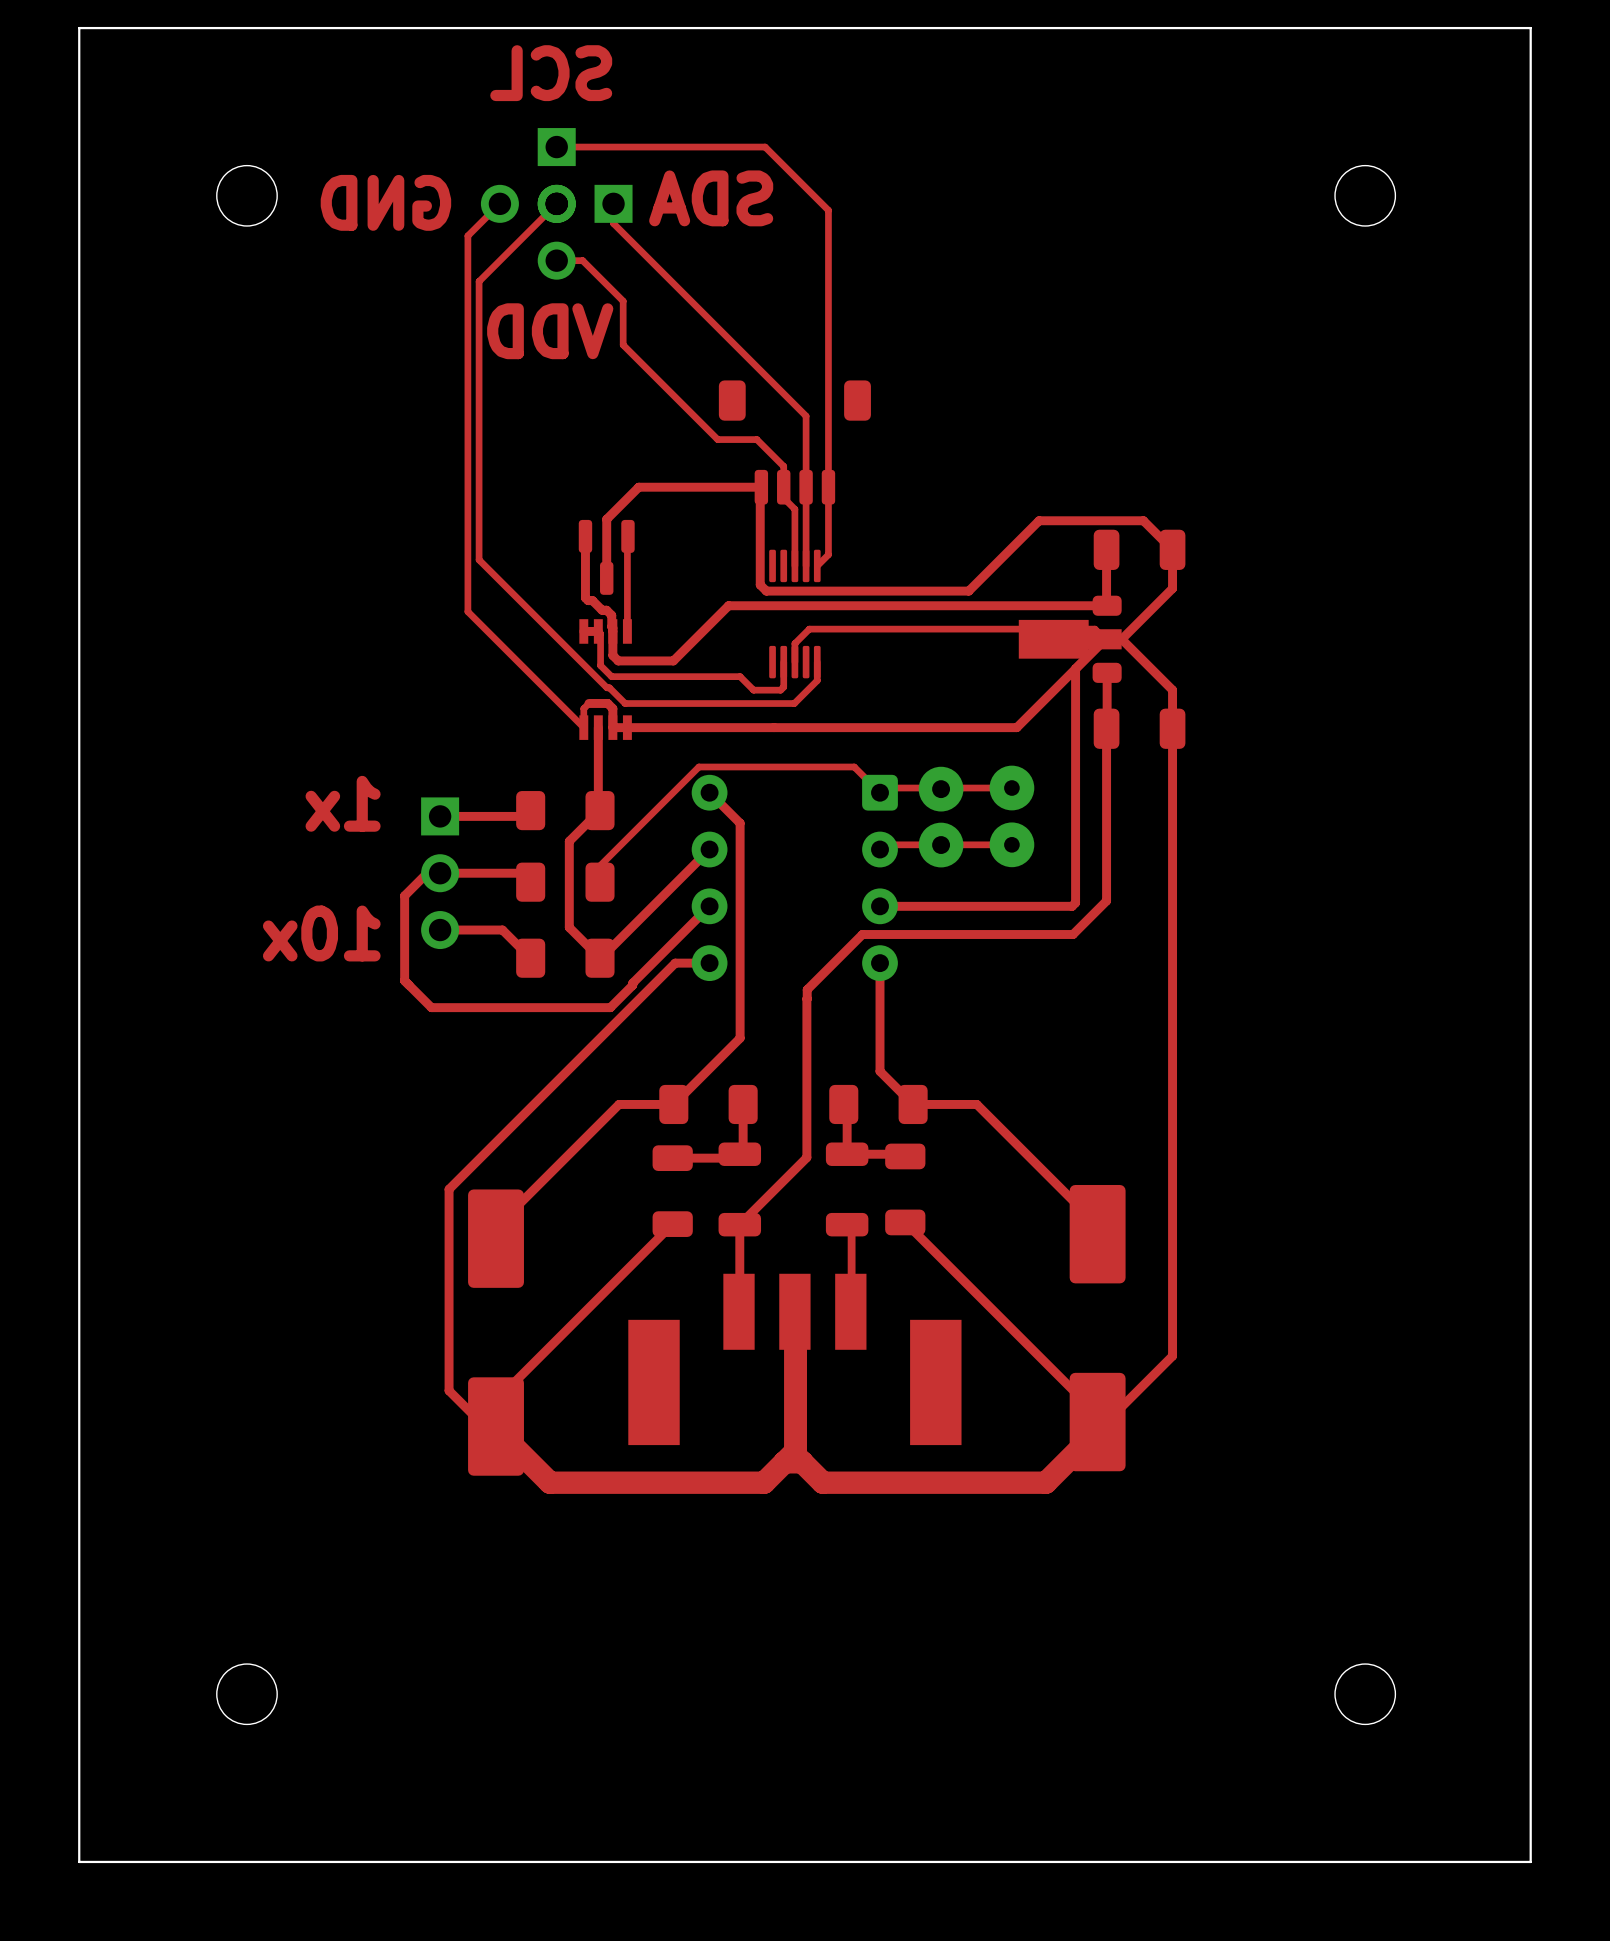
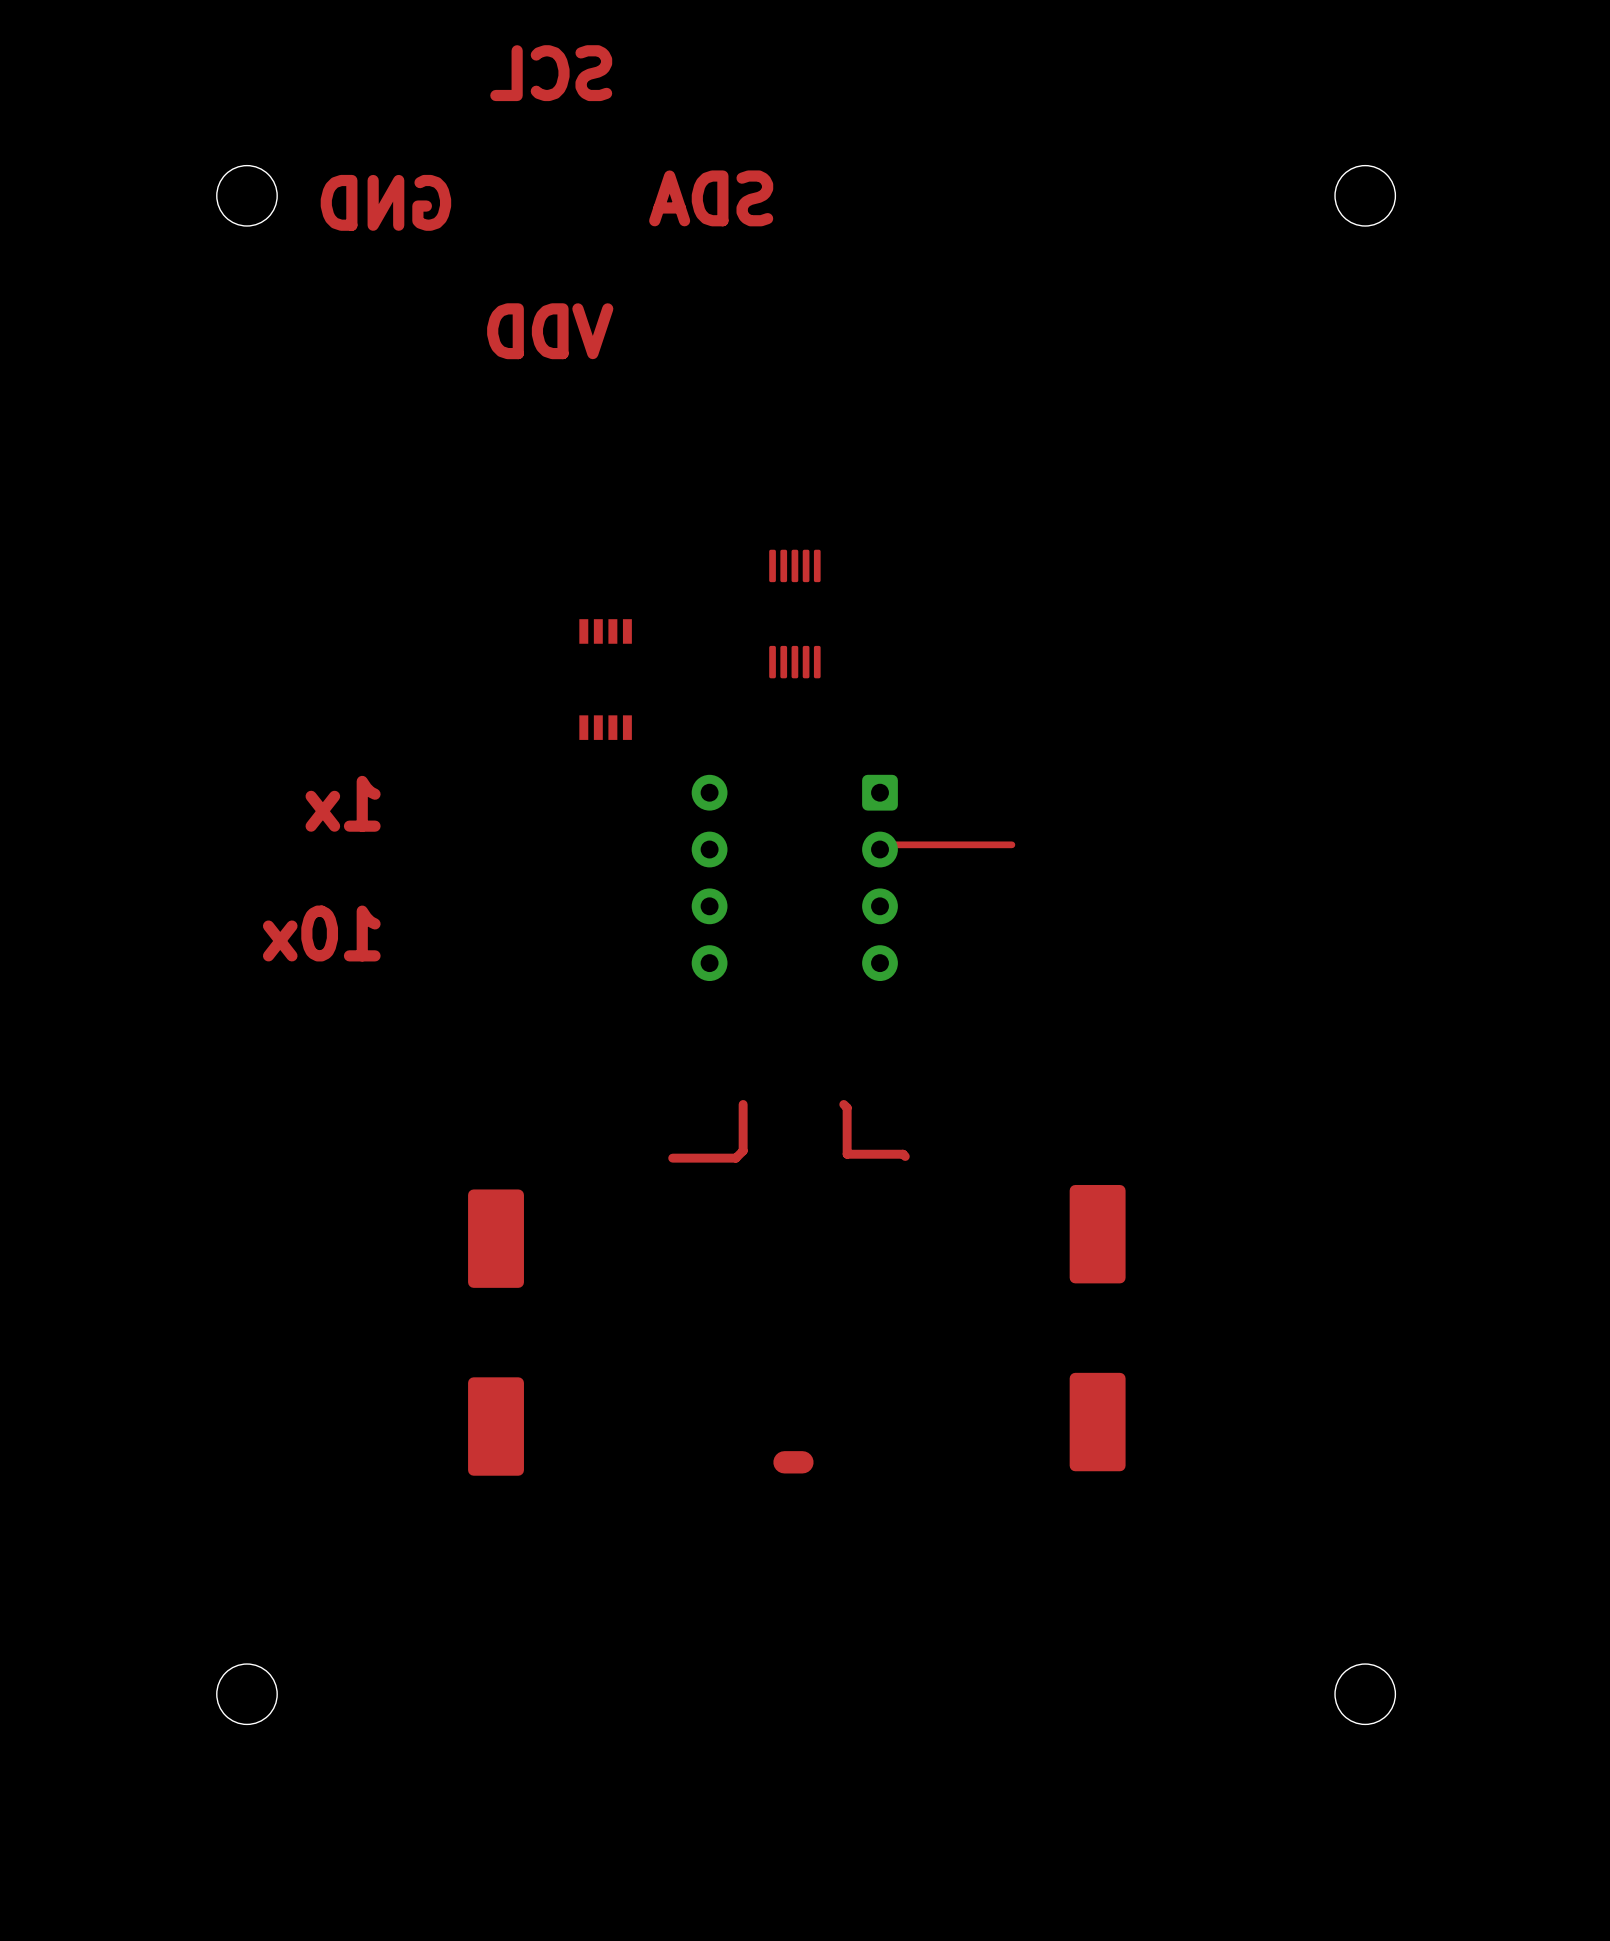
board edge: (1530, 28) (79, 28) (79, 1861) (1530, 1861) (1530, 28) -> none
top track: (556, 147) (765, 147) (828, 210) (828, 554) (817, 565) -> none
top track: (499, 203) (467, 235) (467, 611) (583, 727) (583, 708) (588, 703) (607, 703) (612, 708) (612, 727) (1016, 727) (1105, 639) -> none
top track: (556, 203) (479, 281) (479, 559) (607, 687) (609, 687) (625, 703) (794, 703) (817, 680) (817, 662) -> none
part: (556, 203) -> none
part: (556, 203) -> none
top track: (613, 203) (613, 223) (806, 416) (806, 565) -> none
top track: (556, 260) (582, 260) (623, 301) (623, 345) (717, 439) (756, 439) (783, 466) (783, 498) (794, 509) (794, 565) -> none
part: (794, 442) -> none
top track: (585, 536) (585, 597) (588, 600) (592, 600) (602, 610) (606, 610) (611, 615) (612, 655) (618, 660) (673, 660) (728, 605) (1107, 605) (1106, 549) -> none
top track: (627, 536) (627, 631) -> none
part: (1139, 549) -> none
part: (606, 557) -> none
top track: (606, 578) (606, 519) (638, 487) (761, 487) (760, 584) (766, 591) (968, 591) (1039, 520) (1143, 520) (1172, 549) (1172, 588) (1121, 639) -> none
top track: (583, 631) (598, 631) (600, 633) (600, 665) (611, 676) (740, 676) (753, 690) (780, 690) (783, 687) (783, 662) -> none
part: (1070, 639) -> none
top track: (1105, 639) (1094, 629) (809, 629) (794, 643) (794, 662) -> none
top track: (1121, 639) (1172, 690) (1172, 1356) (1106, 1422) (1097, 1422) -> none
top track: (1075, 668) (1075, 902) (1072, 906) (880, 906) -> none
top track: (1107, 672) (1106, 900) (1073, 934) (862, 934) (807, 989) (806, 1157) (739, 1224) (739, 1311) -> none
top track: (598, 727) (598, 808) (600, 810) (569, 841) (569, 927) (600, 958) (709, 849) -> none
part: (1139, 728) -> none
top track: (1011, 788) (884, 788) (880, 792) (854, 766) (698, 766) (600, 865) (600, 882) -> none
top track: (709, 792) (740, 823) (740, 1038) (673, 1104) (619, 1104) (496, 1227) (496, 1238) -> none
top track: (530, 810) (524, 816) (440, 816) -> none
part: (565, 810) -> none
part: (1011, 816) -> none
part: (941, 817) -> none
part: (440, 873) -> none
top track: (530, 882) (521, 873) (427, 873) (404, 895) (404, 980) (431, 1007) (610, 1007) (709, 906) -> none
part: (565, 882) -> none
top track: (440, 930) (502, 930) (530, 958) -> none
part: (565, 958) -> none
top track: (709, 963) (675, 963) (449, 1189) (449, 1390) (484, 1426) (496, 1426) (484, 1415) (484, 1411) (672, 1224) -> none
top track: (880, 963) (880, 1071) (913, 1104) -> none
part: (708, 1104) -> none
part: (878, 1104) -> none
top track: (913, 1104) (976, 1104) (1097, 1225) (1097, 1234) -> none
part: (739, 1189) -> none
part: (847, 1189) -> none
part: (905, 1189) -> none
part: (672, 1191) -> none
top track: (905, 1222) (1097, 1414) (1097, 1422) -> none
top track: (847, 1224) (851, 1229) (851, 1311) -> none
top track: (795, 1311) (795, 1455) (822, 1482) (1045, 1482) (1097, 1430) (1097, 1422) -> none
part: (794, 1359) -> none
top track: (489, 1422) (549, 1482) (764, 1482) (795, 1451) -> none

